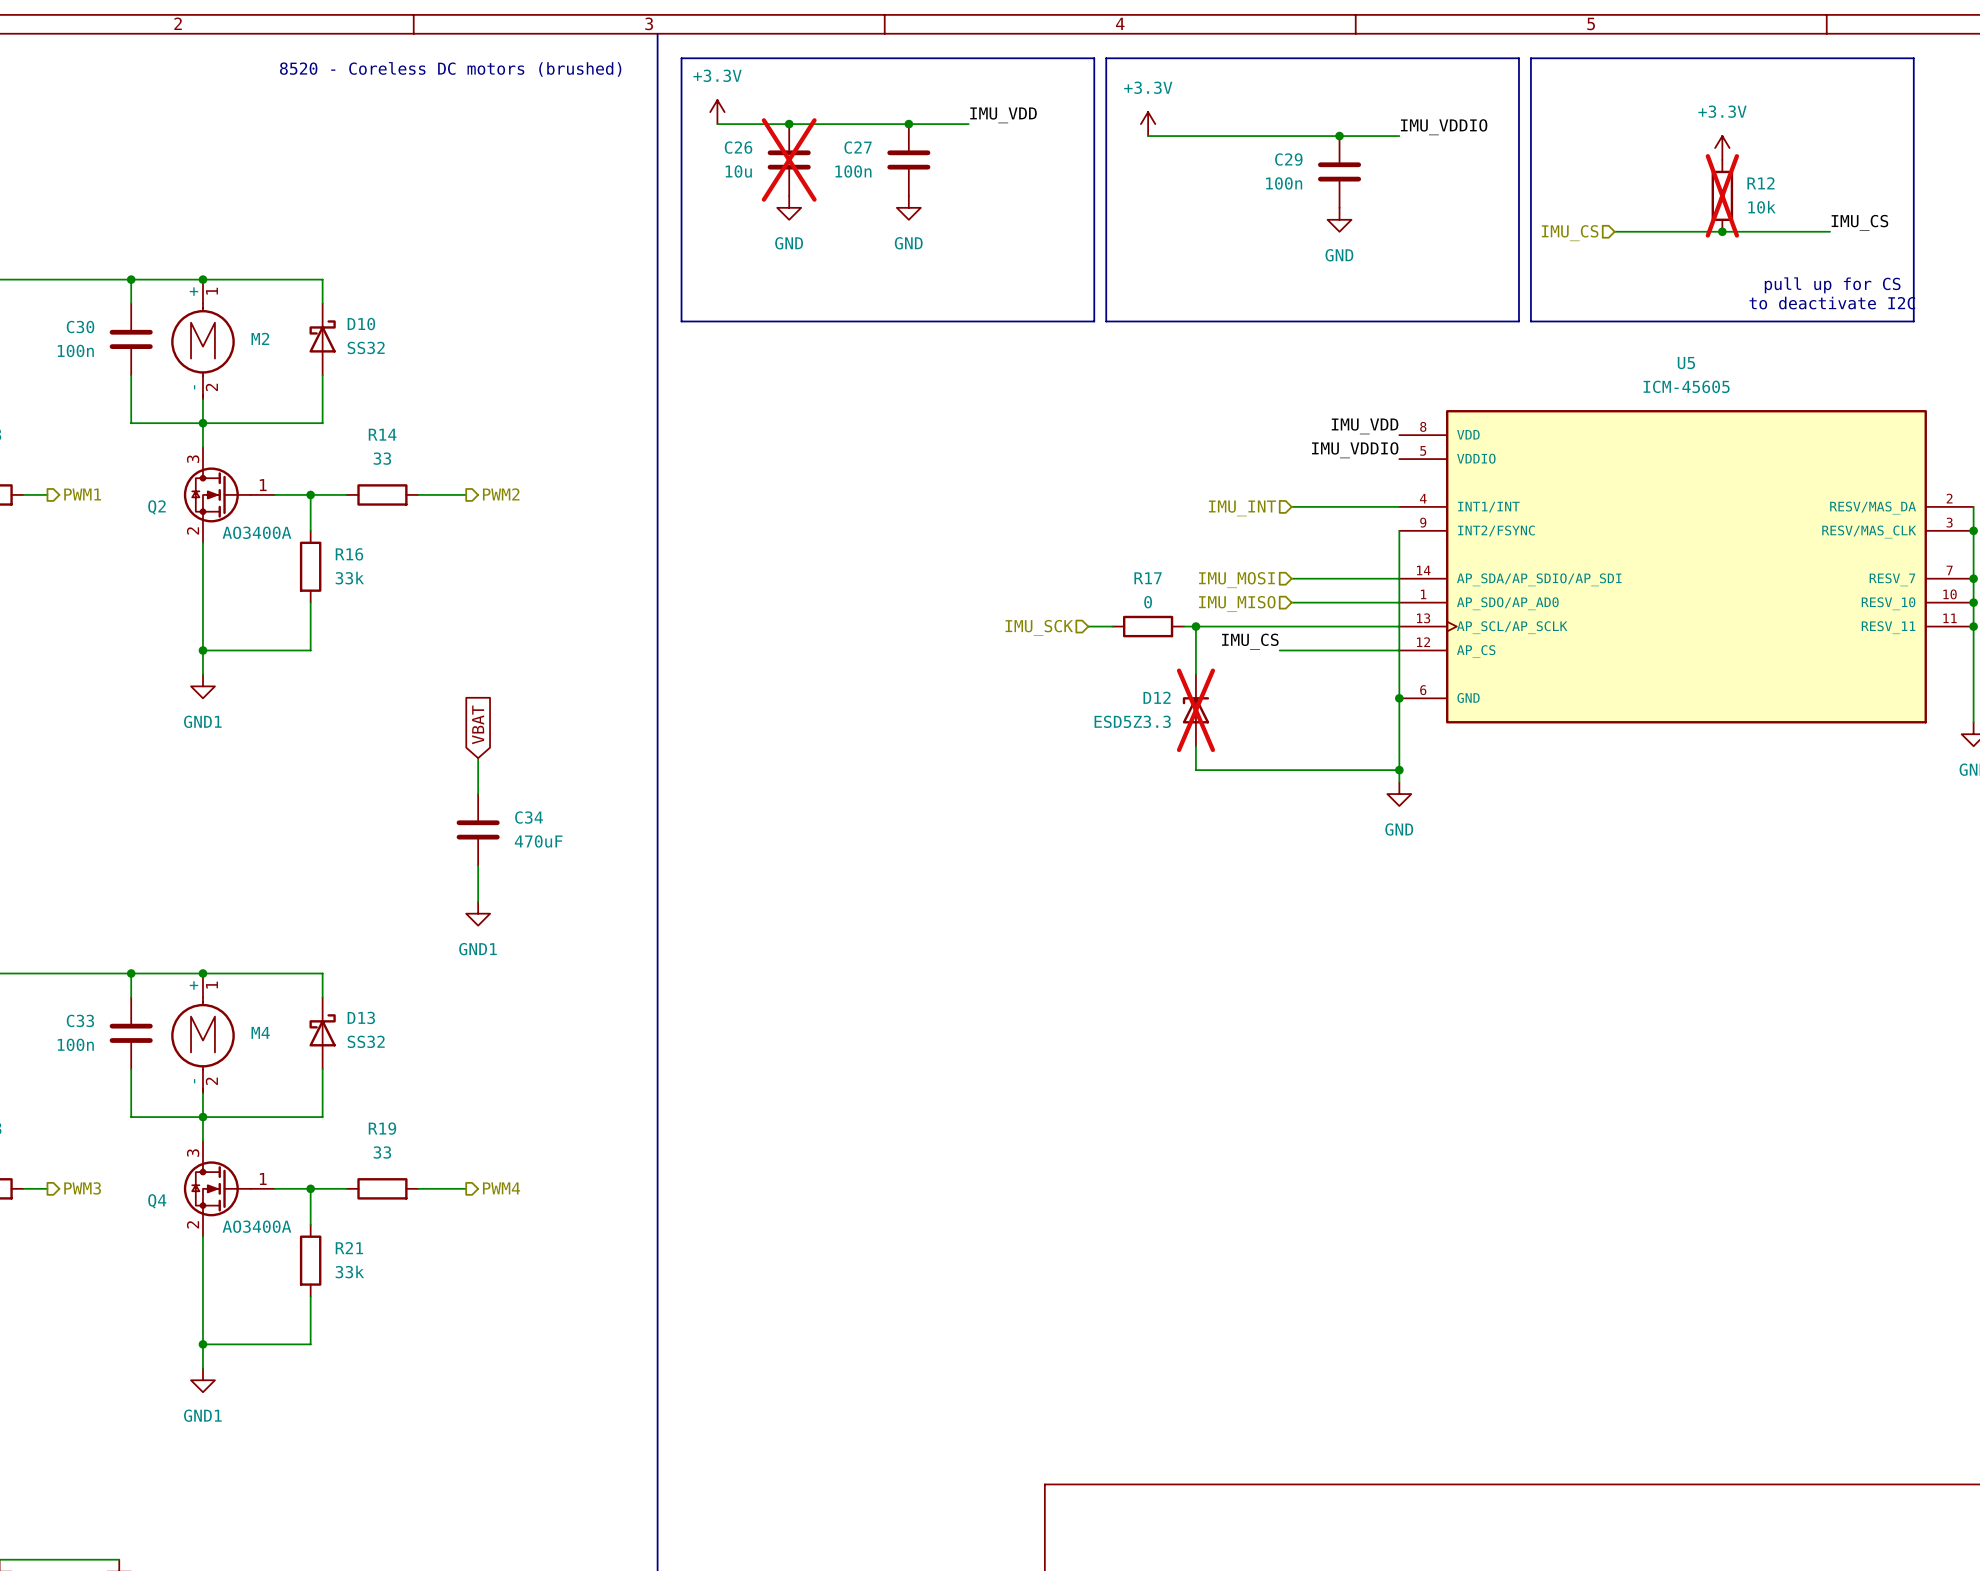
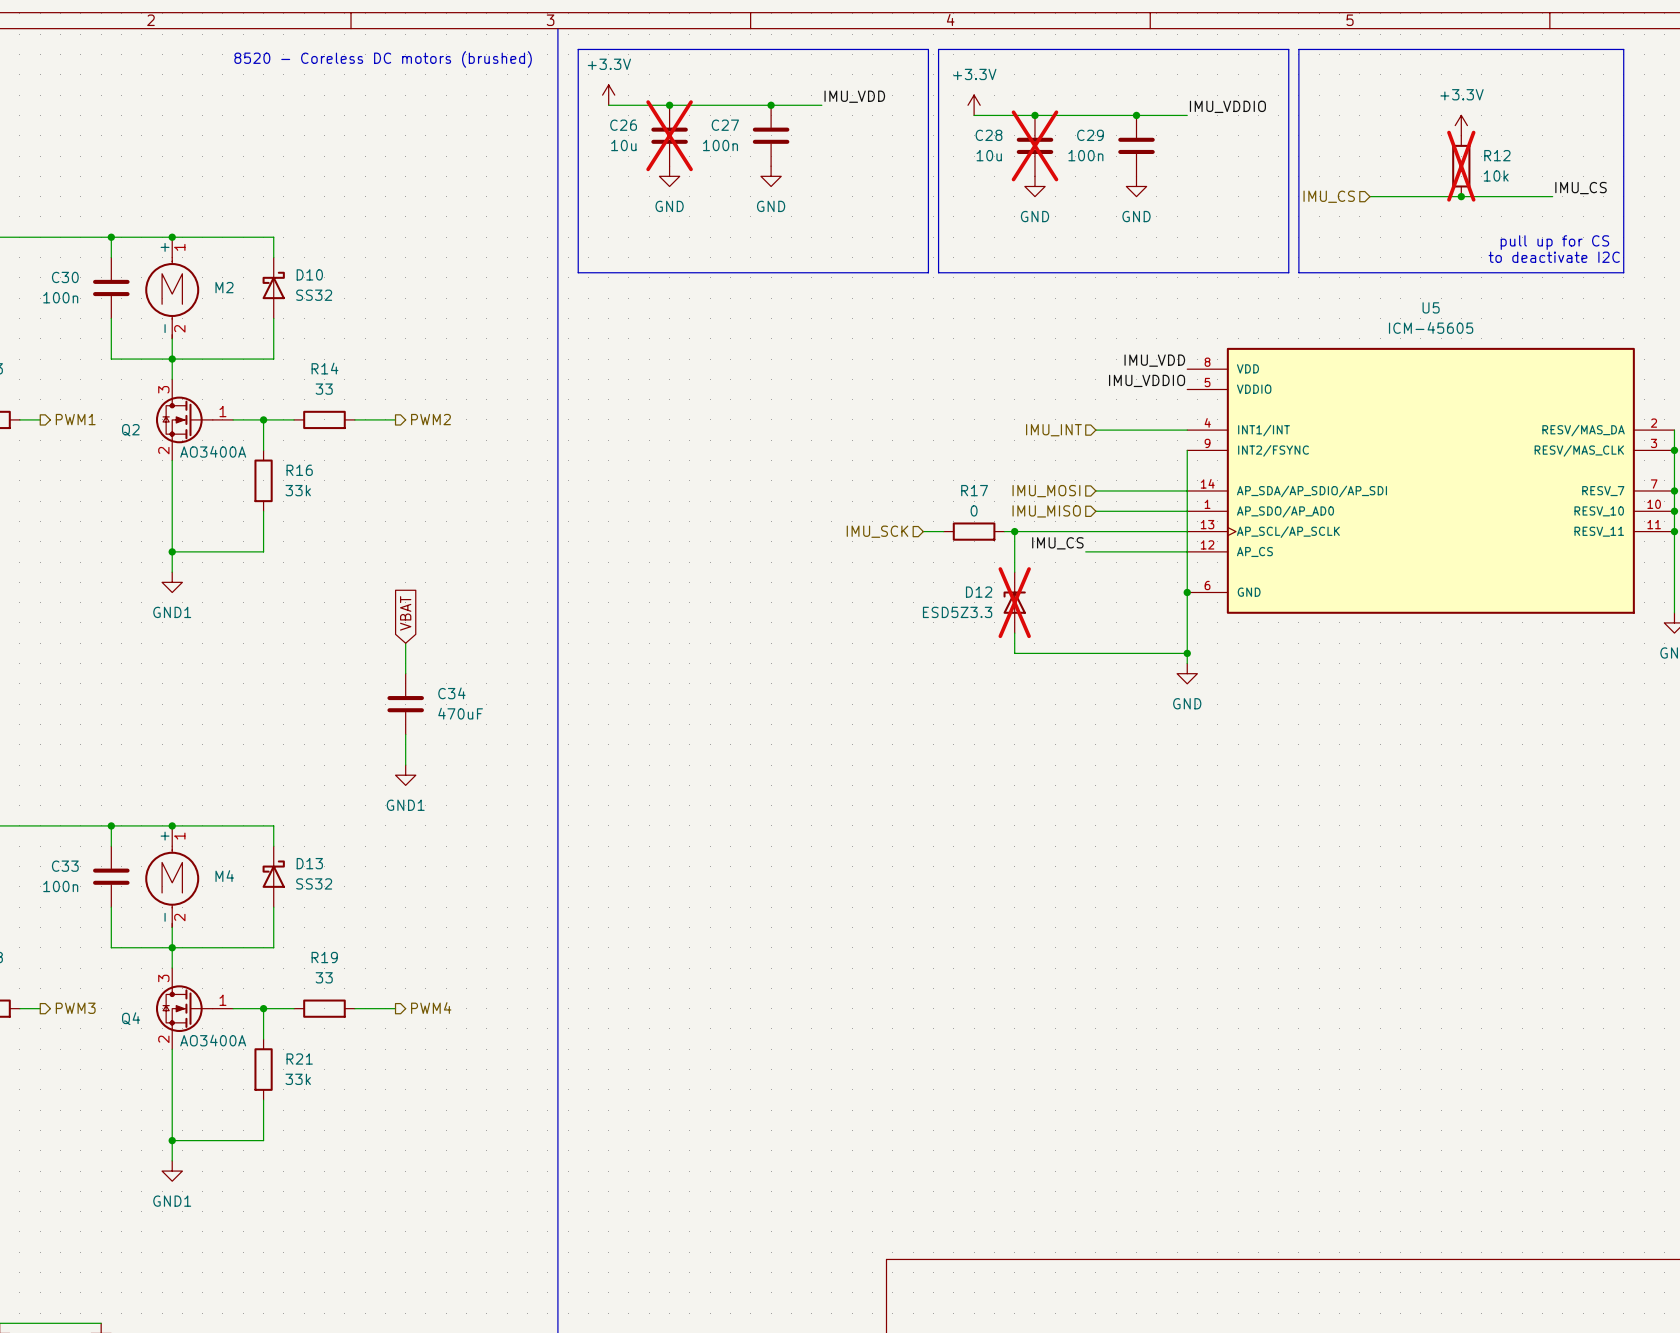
junction: none -> (1034, 115)
C28: none -> 10u (1034, 145)
power symbol: none -> GND (1034, 186)

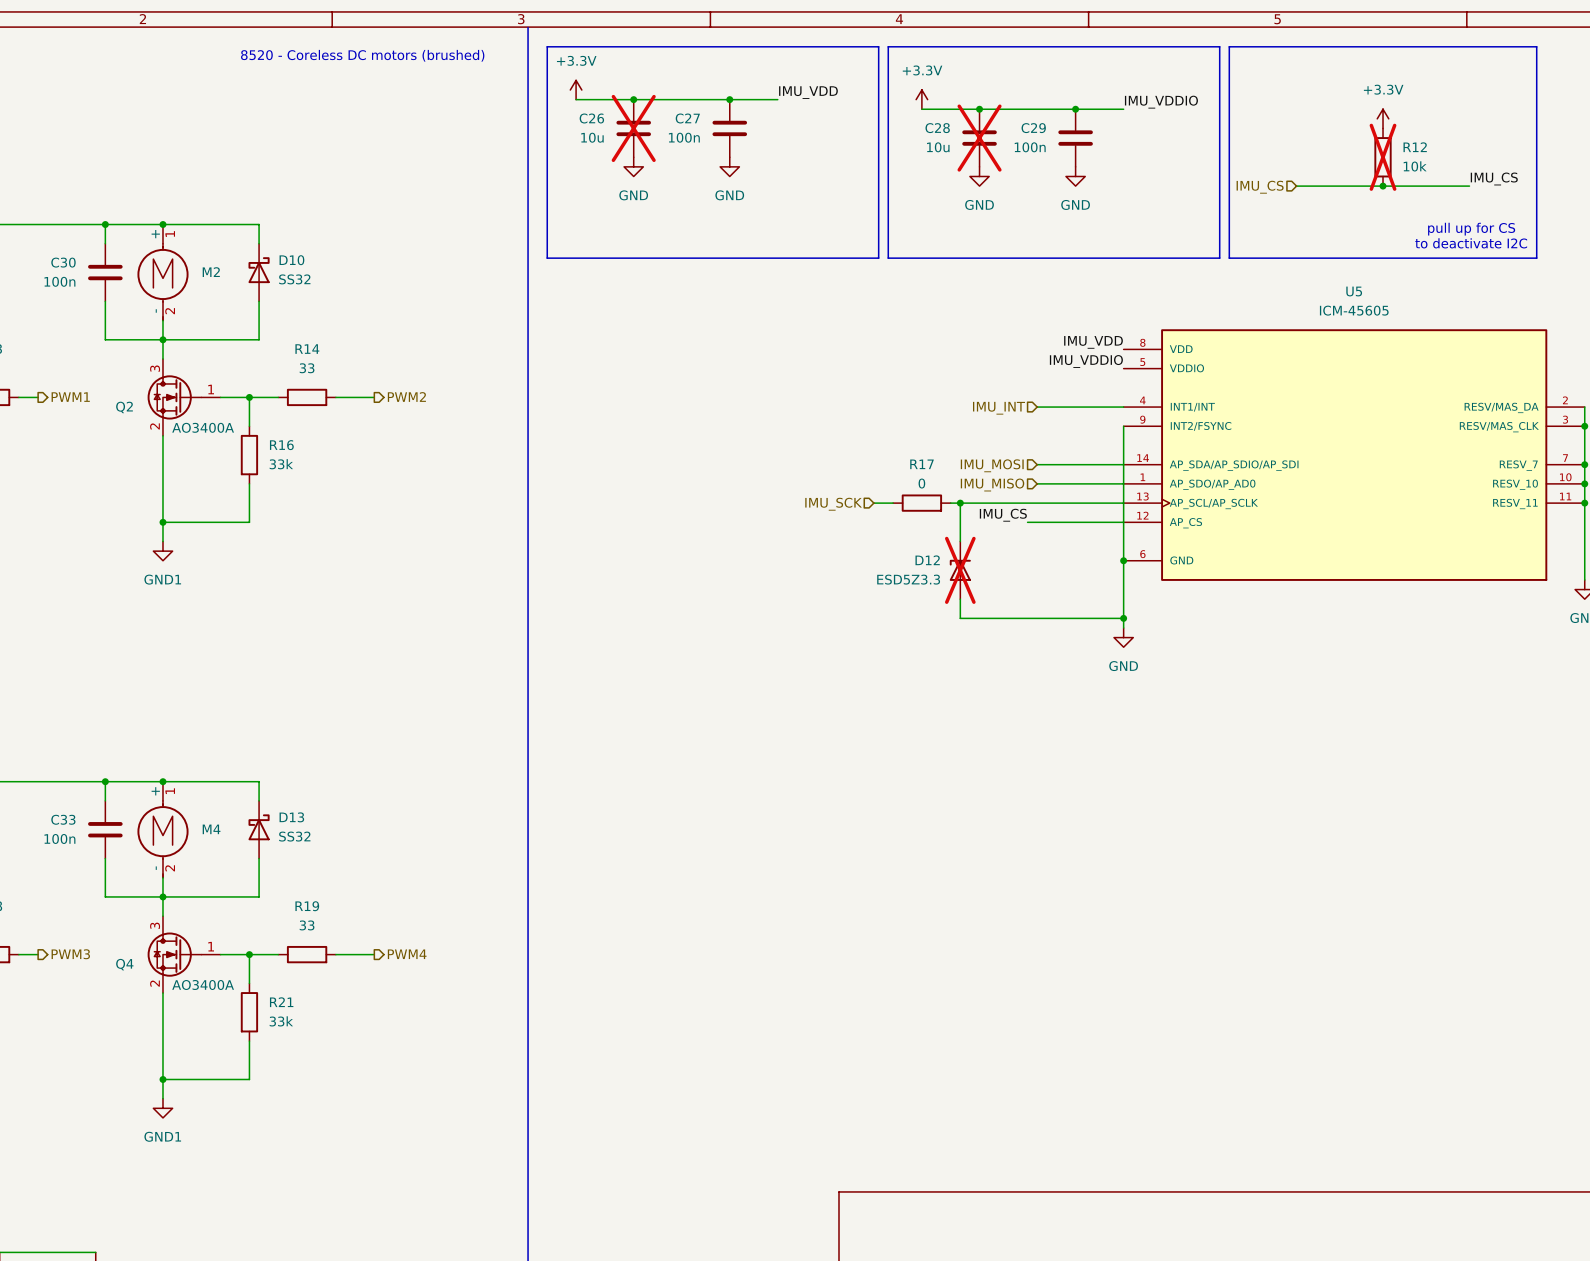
global label: VBAT (405, 613) -> none
wire: (405, 643) (405, 673) -> none
C34: 470uF (405, 704) -> none
wire: (405, 734) (405, 765) -> none
power symbol: GND1 (405, 775) -> none

